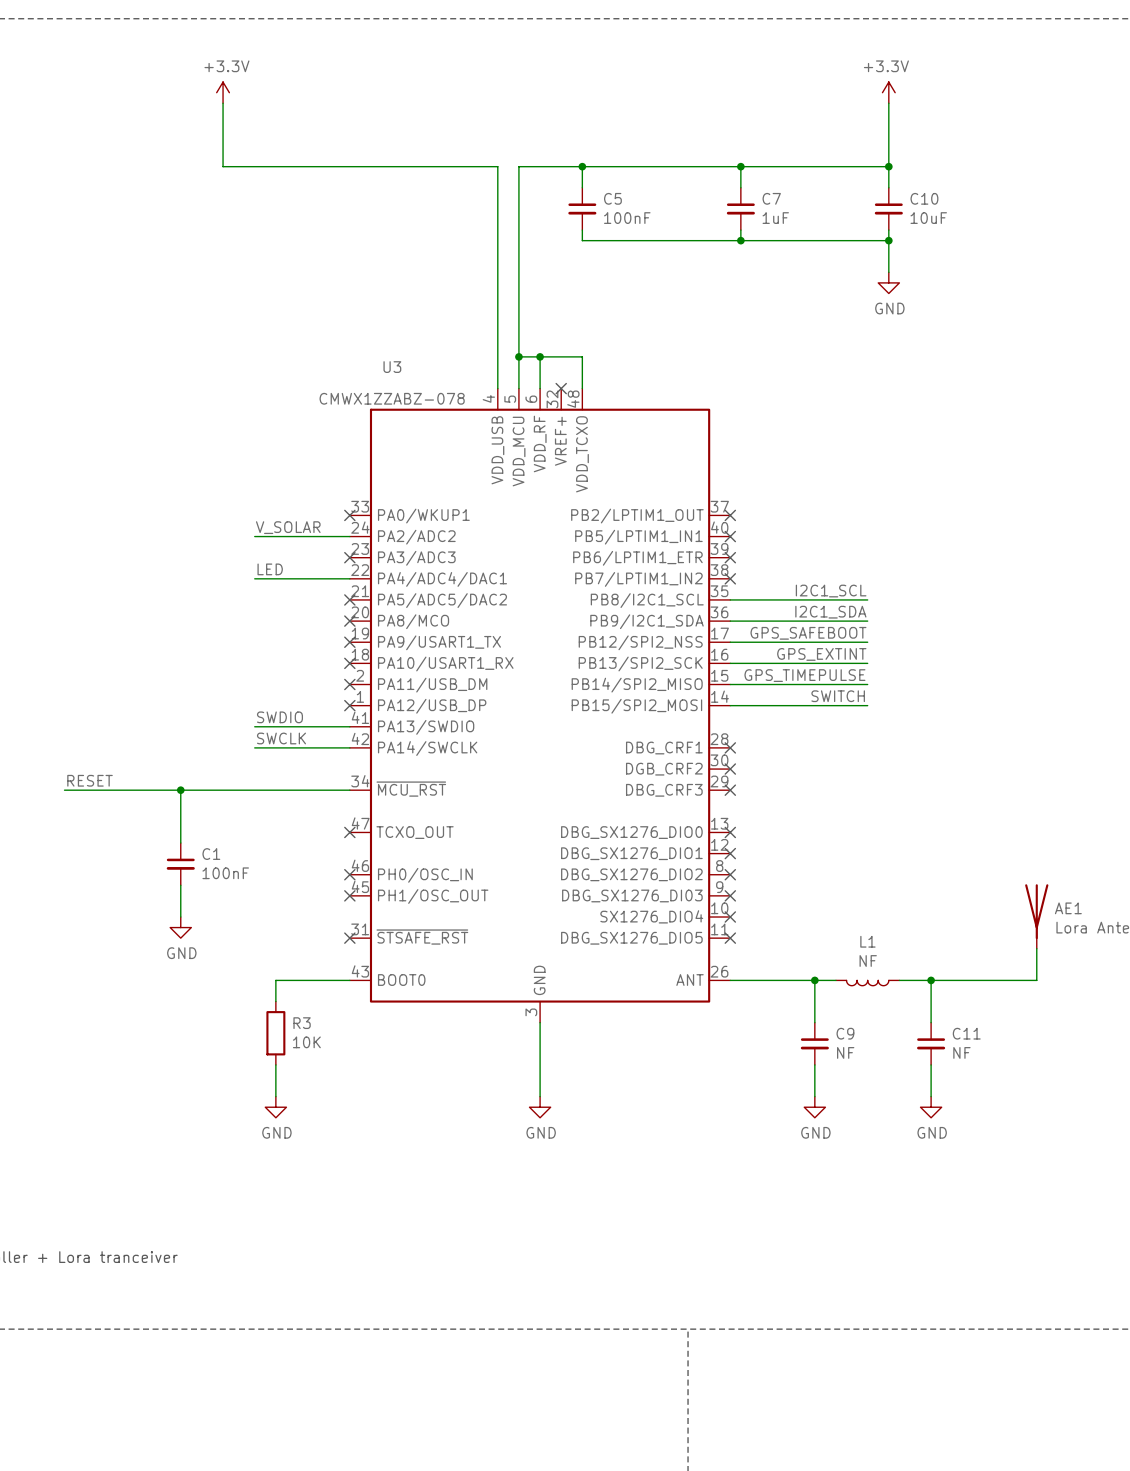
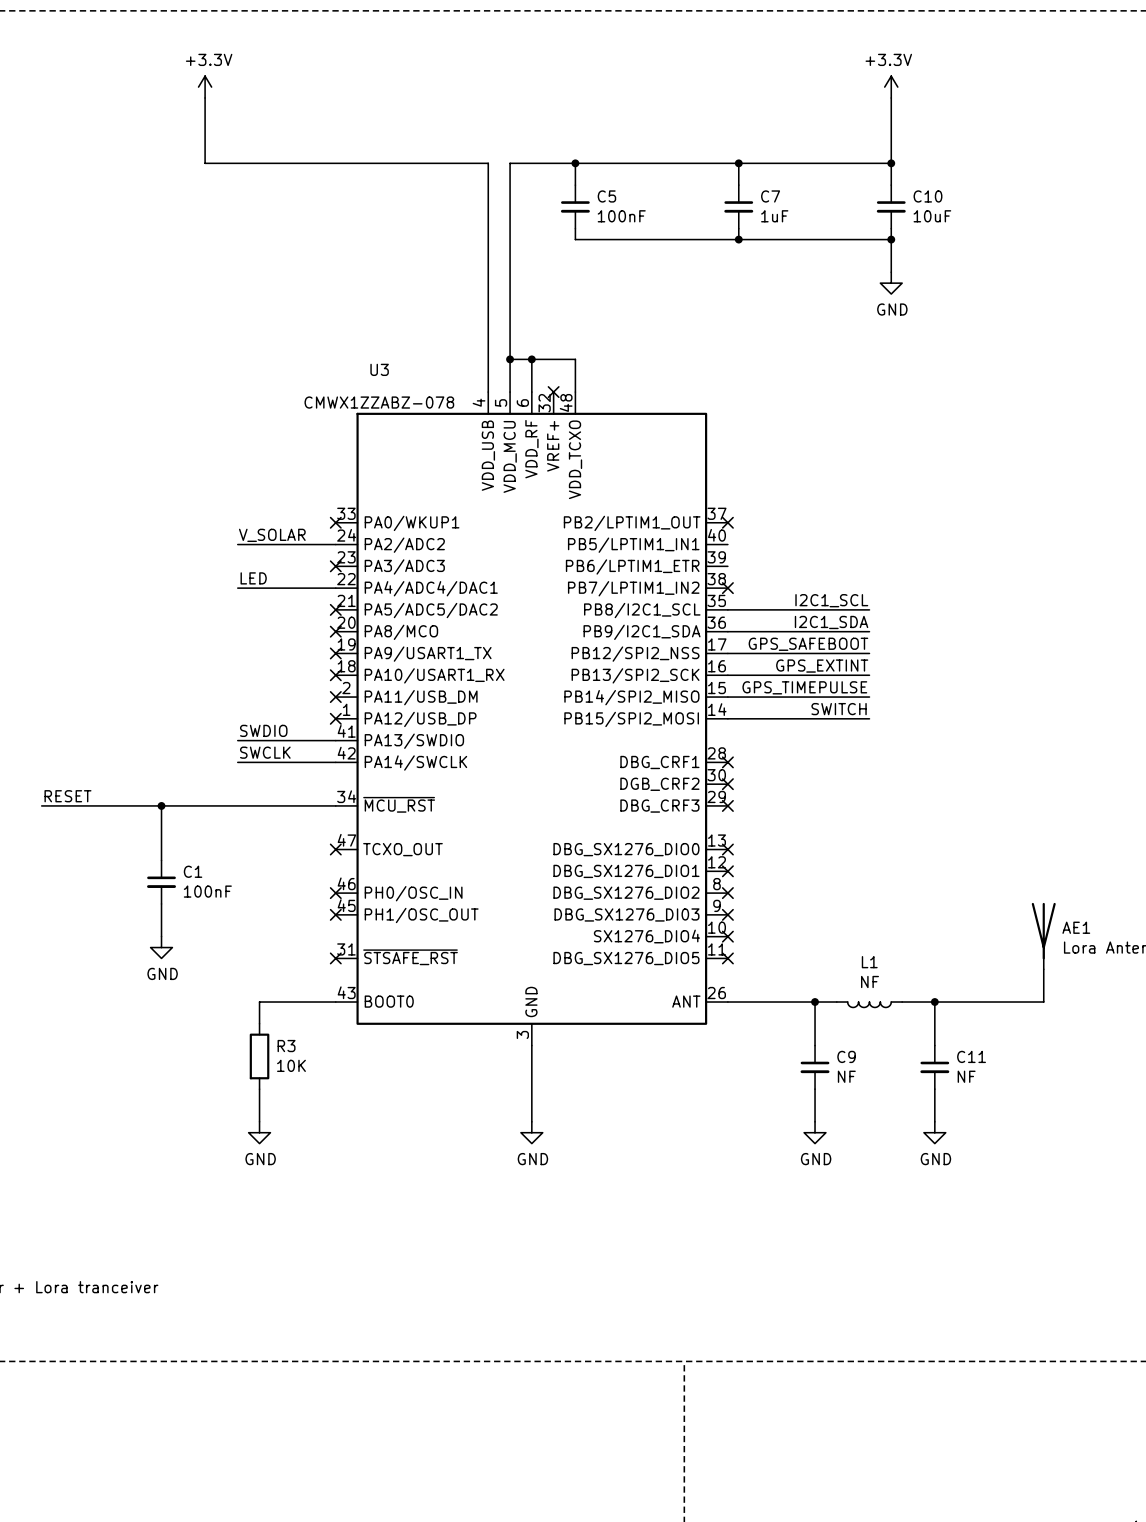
no-connect mark: (730, 536) -> none
no-connect mark: (730, 557) -> none

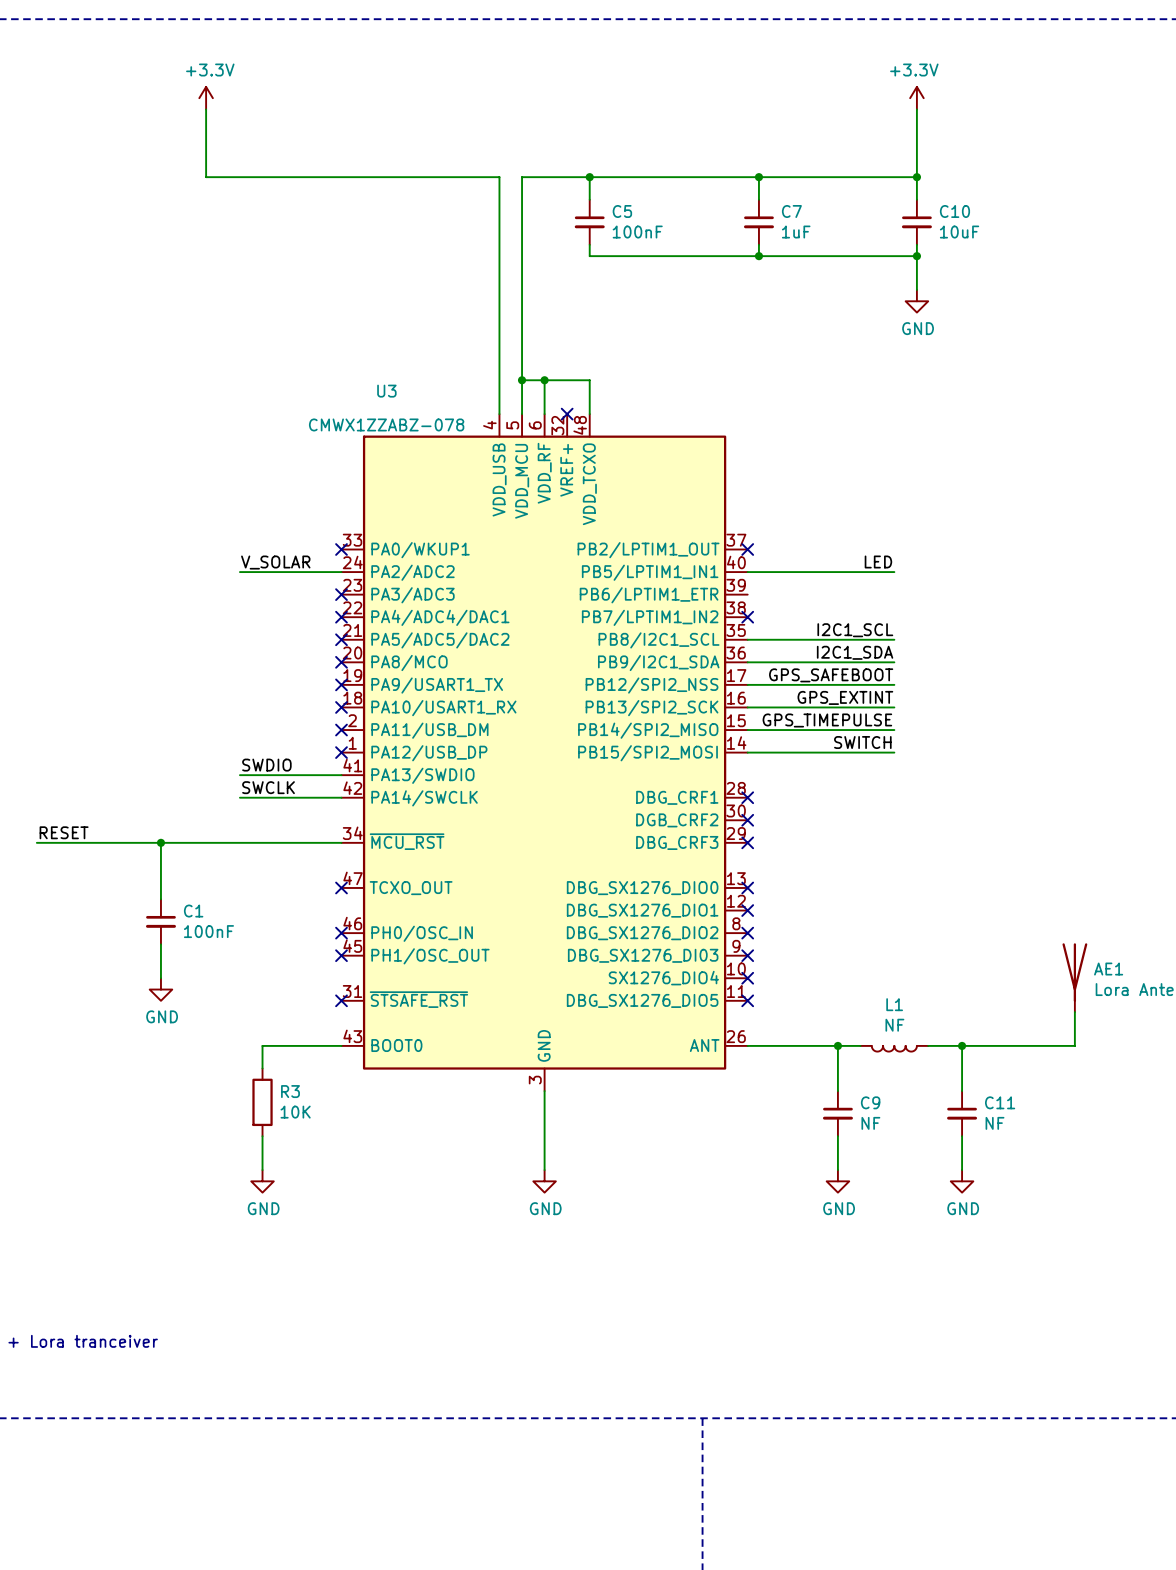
label: none -> LED (878, 561)
wire: none -> (747, 572) (894, 572)
label: LED (253, 578) -> none
wire: (237, 588) (335, 588) -> none
no-connect mark: none -> (341, 617)

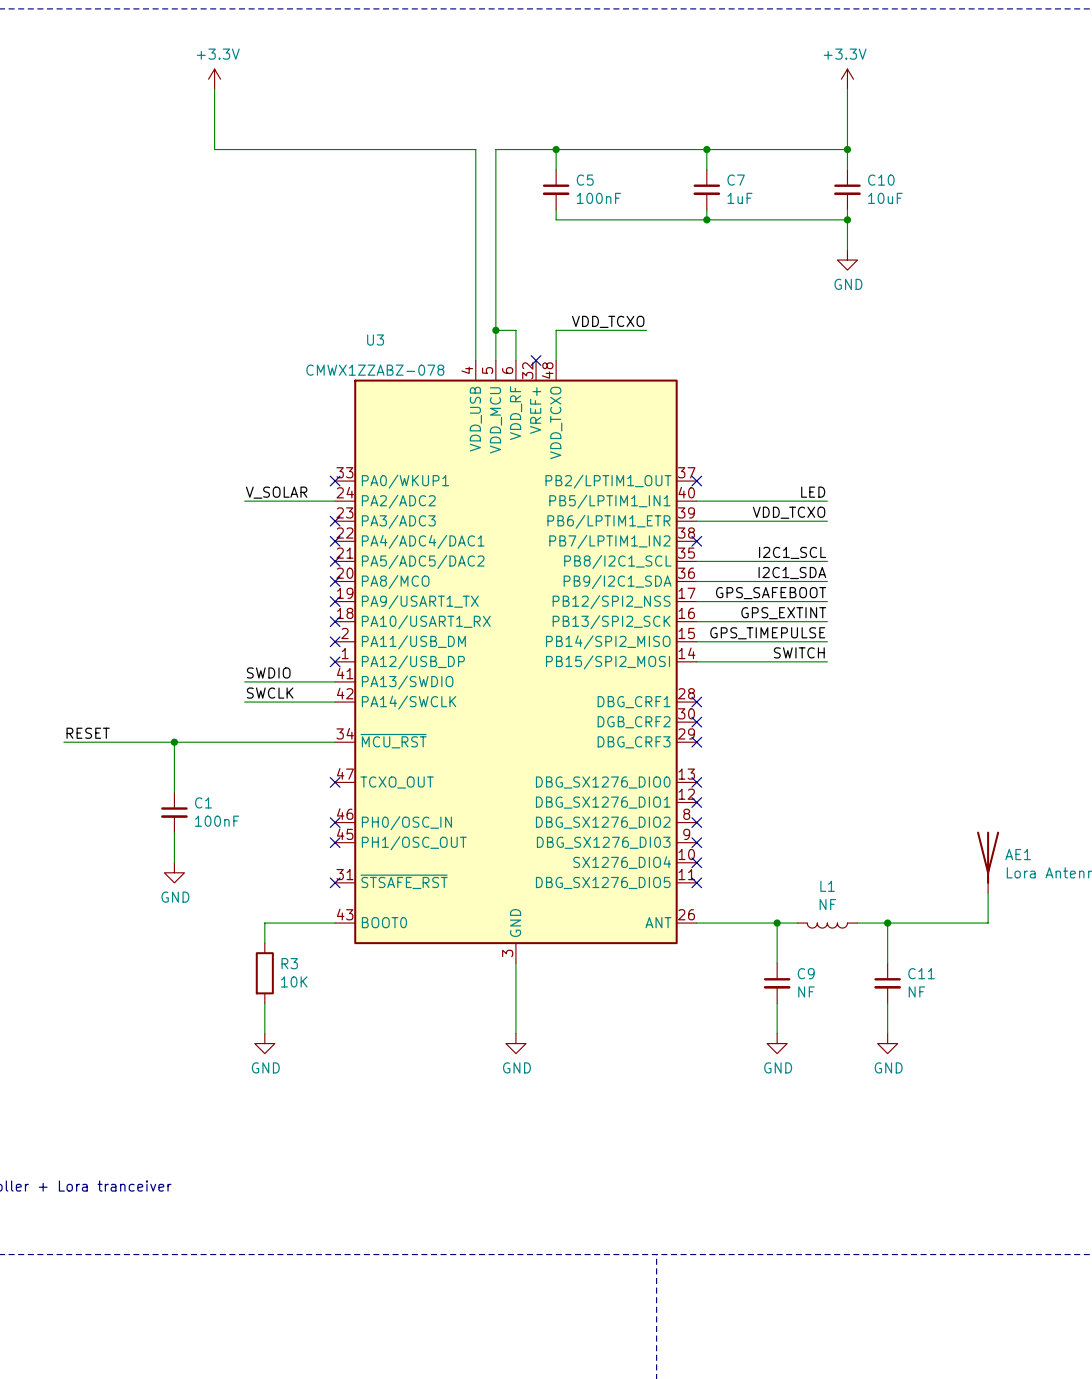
label: none -> VDD_TCXO (608, 321)
wire: (544, 380) (589, 380) -> (646, 330) (556, 330)
junction: (544, 380) -> none
label: none -> VDD_TCXO (789, 512)
wire: none -> (696, 521) (827, 521)

